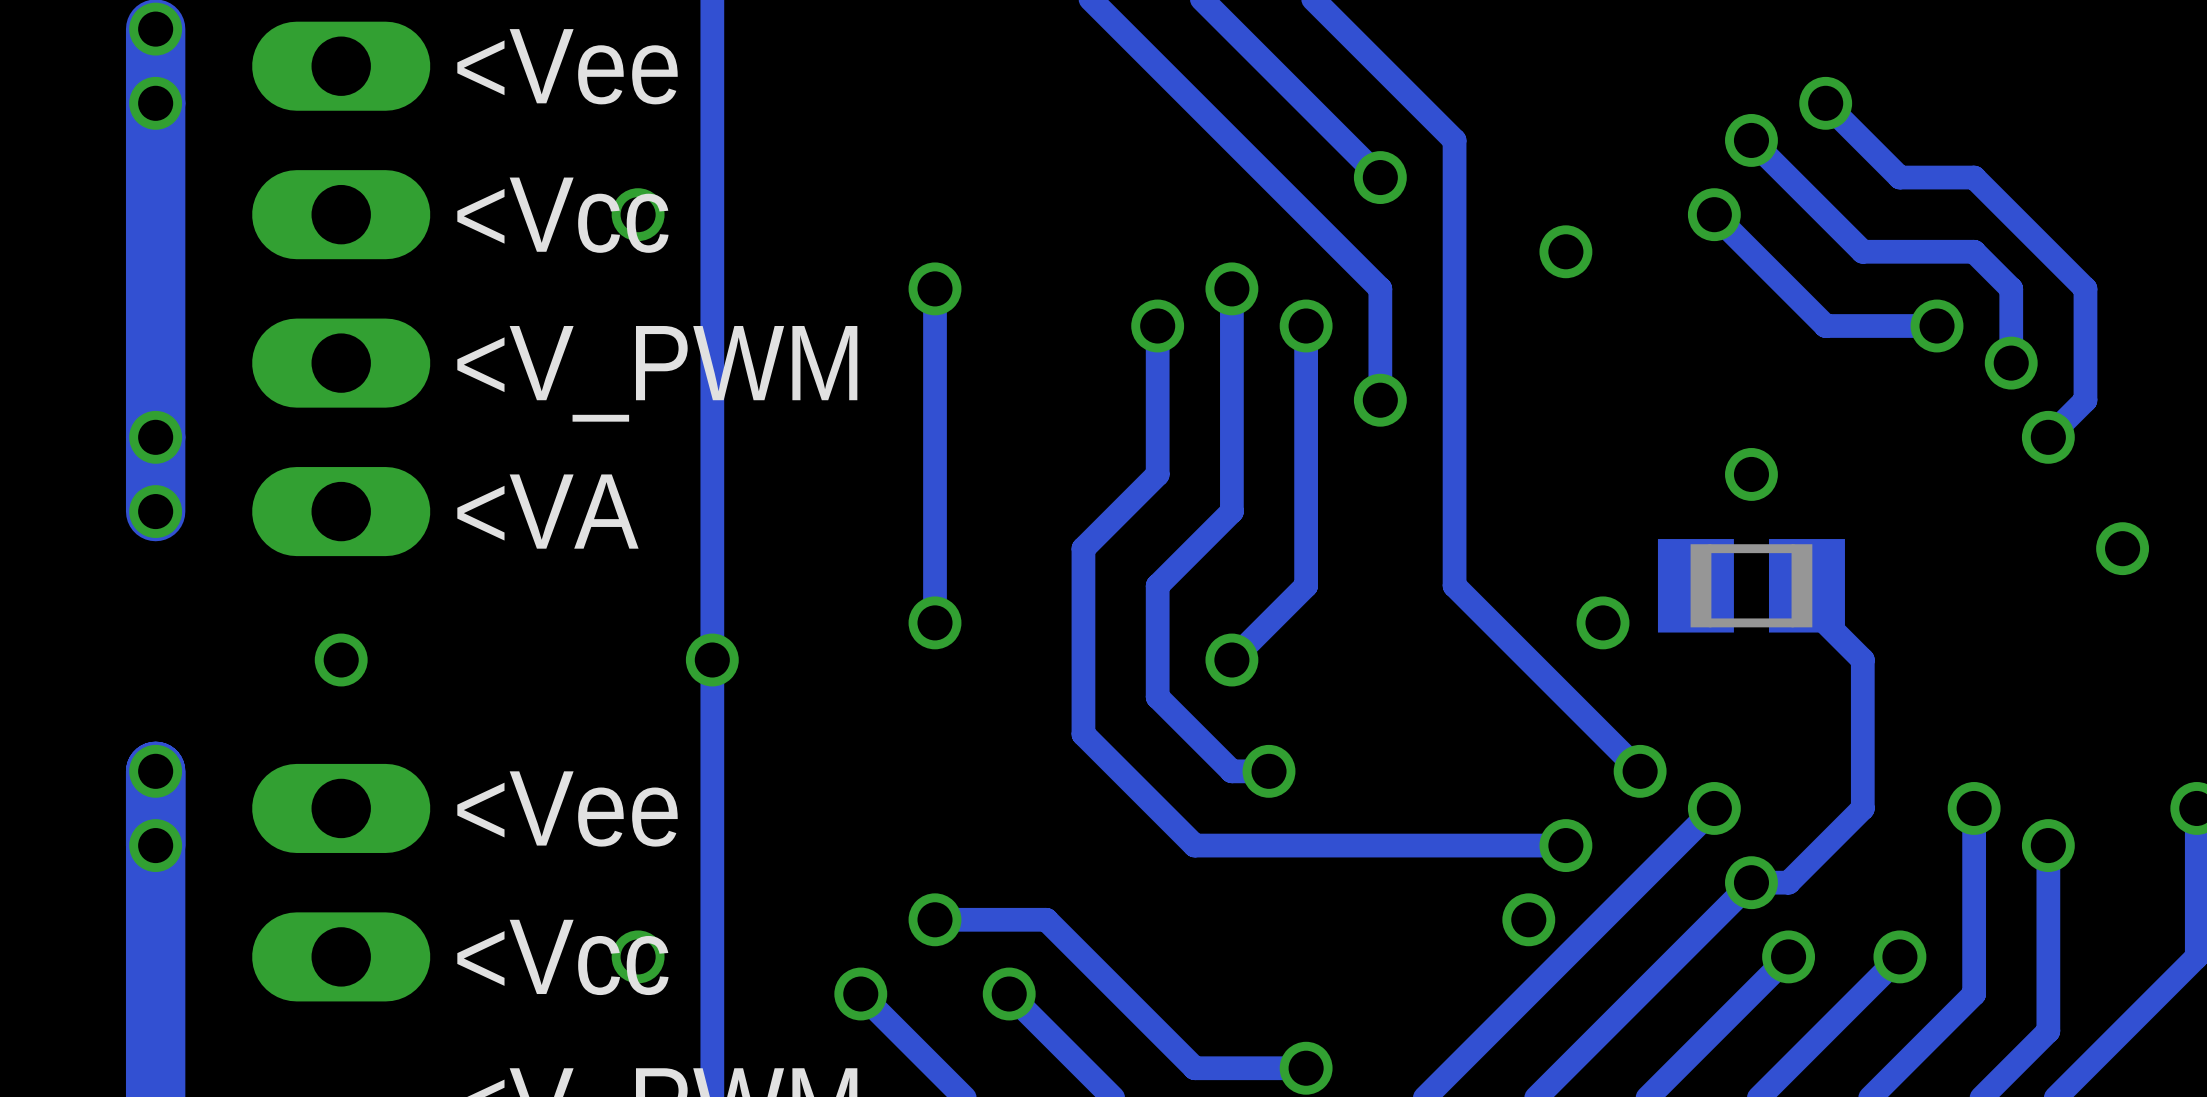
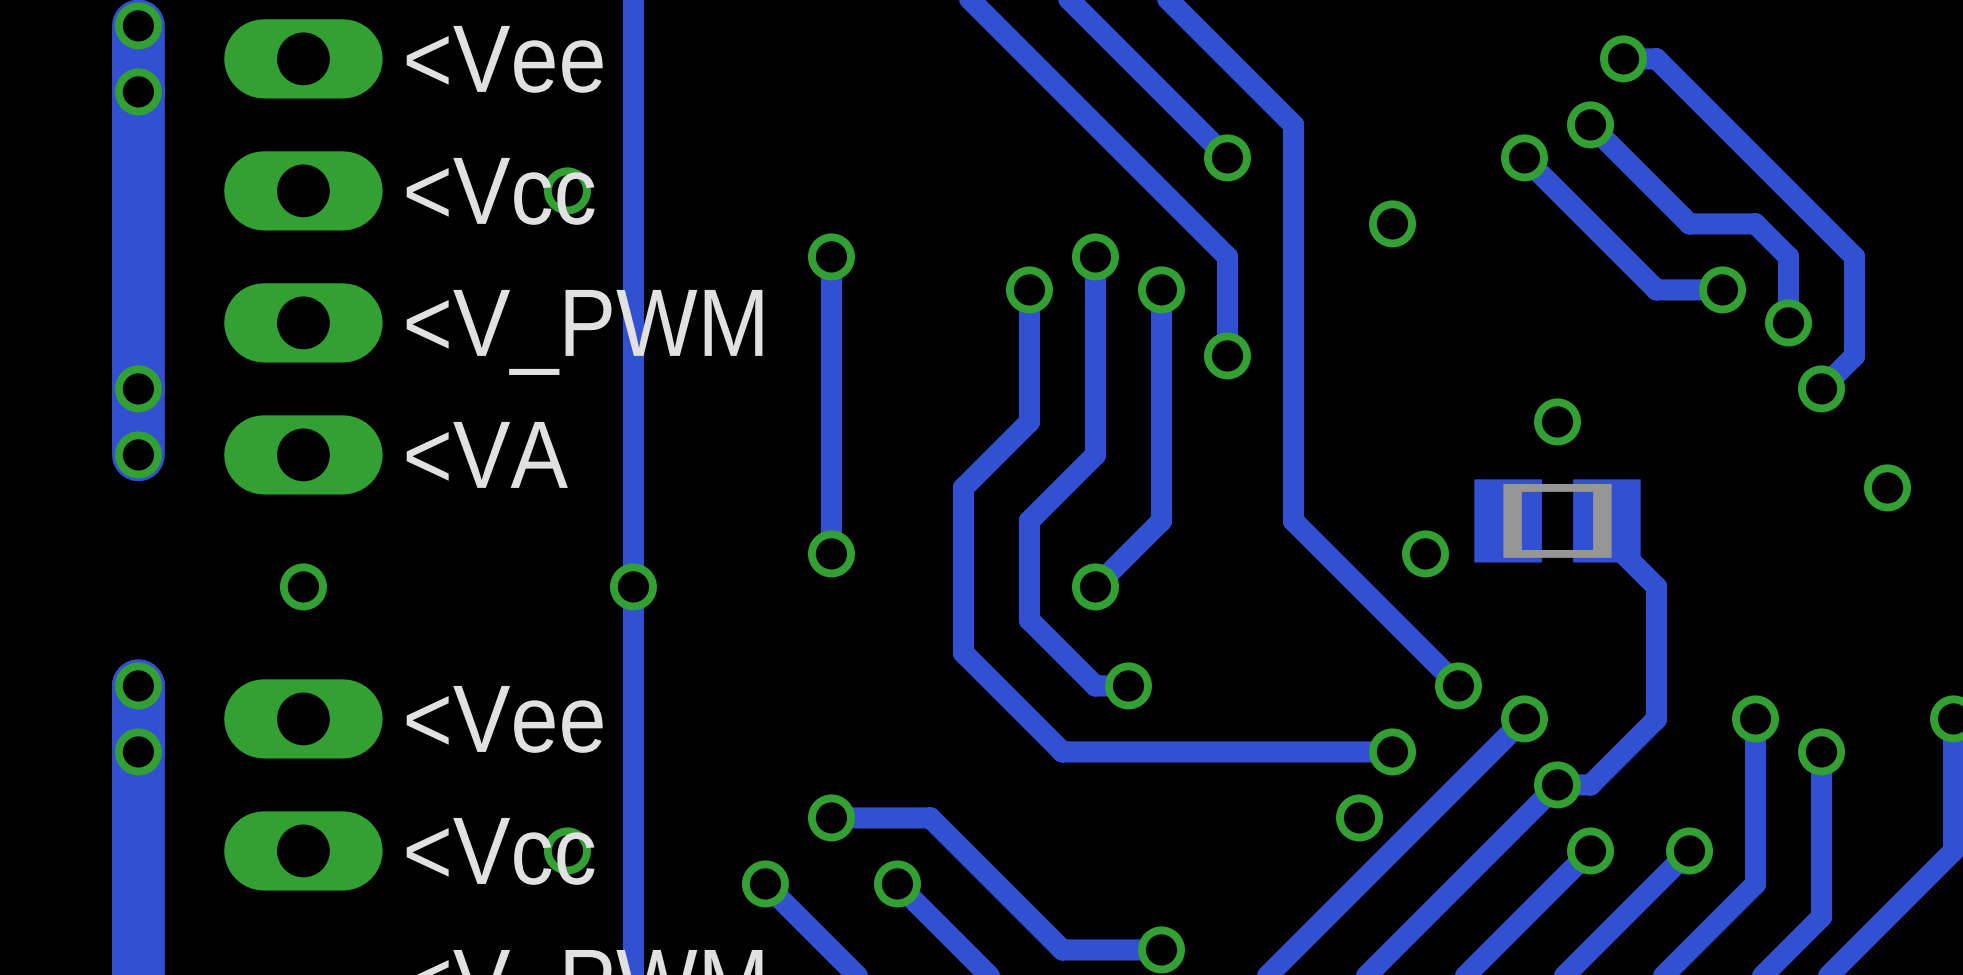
via: none -> (1623, 58)
track: (1825, 103) (1899, 177) (1974, 177) -> (1623, 58) (1656, 58) (1755, 157)
via: (1825, 103) -> none
track: (1751, 140) (1862, 251) (1899, 251) -> (1590, 124) (1689, 223)
via: (1751, 140) -> none
via: none -> (1590, 124)
via: none -> (1524, 157)
track: (1714, 214) (1825, 326) (1862, 326) -> (1524, 157) (1656, 289)
via: (1714, 214) -> none

